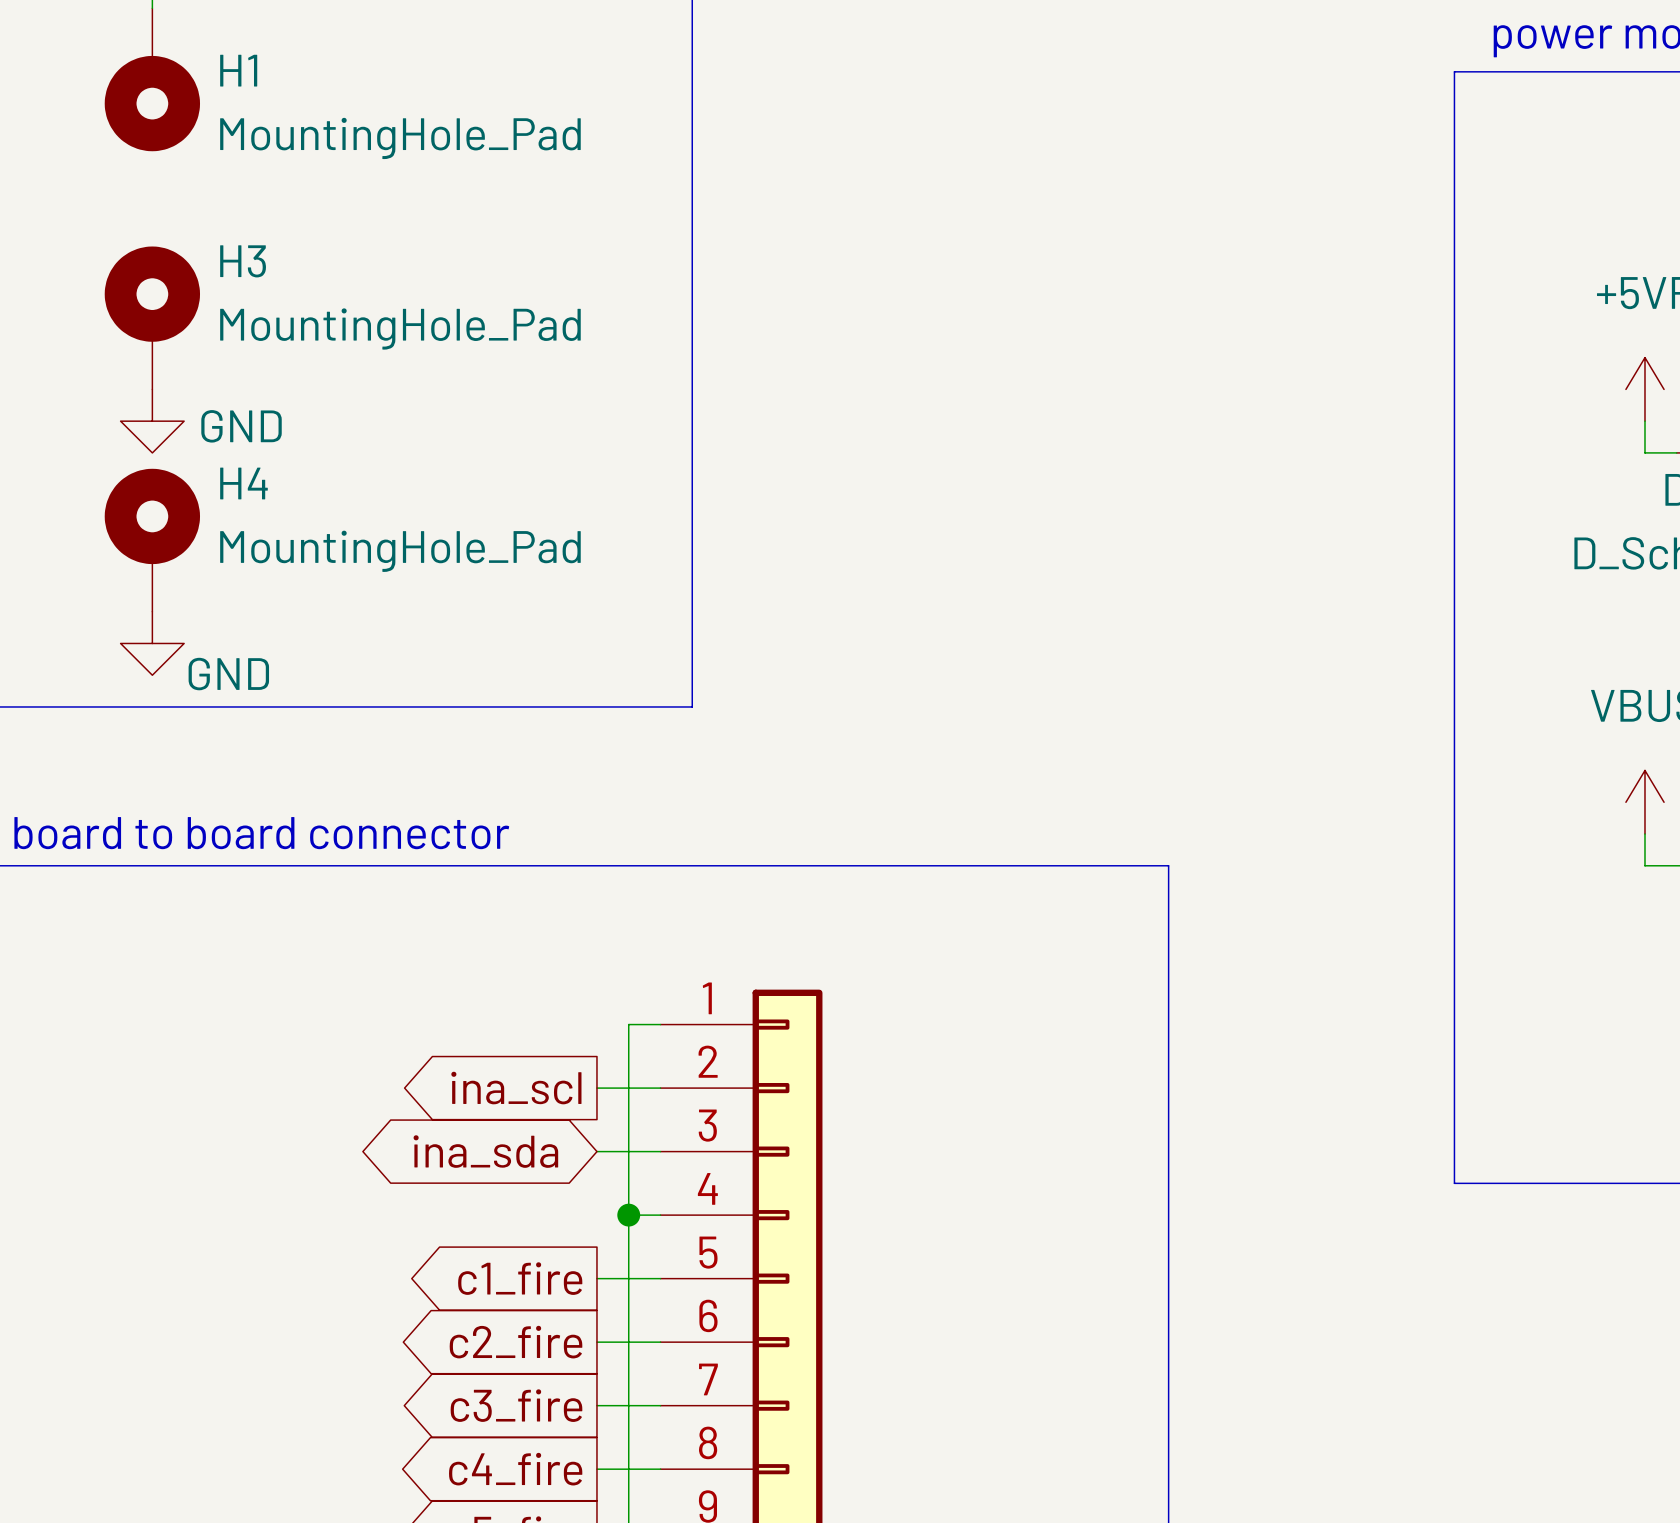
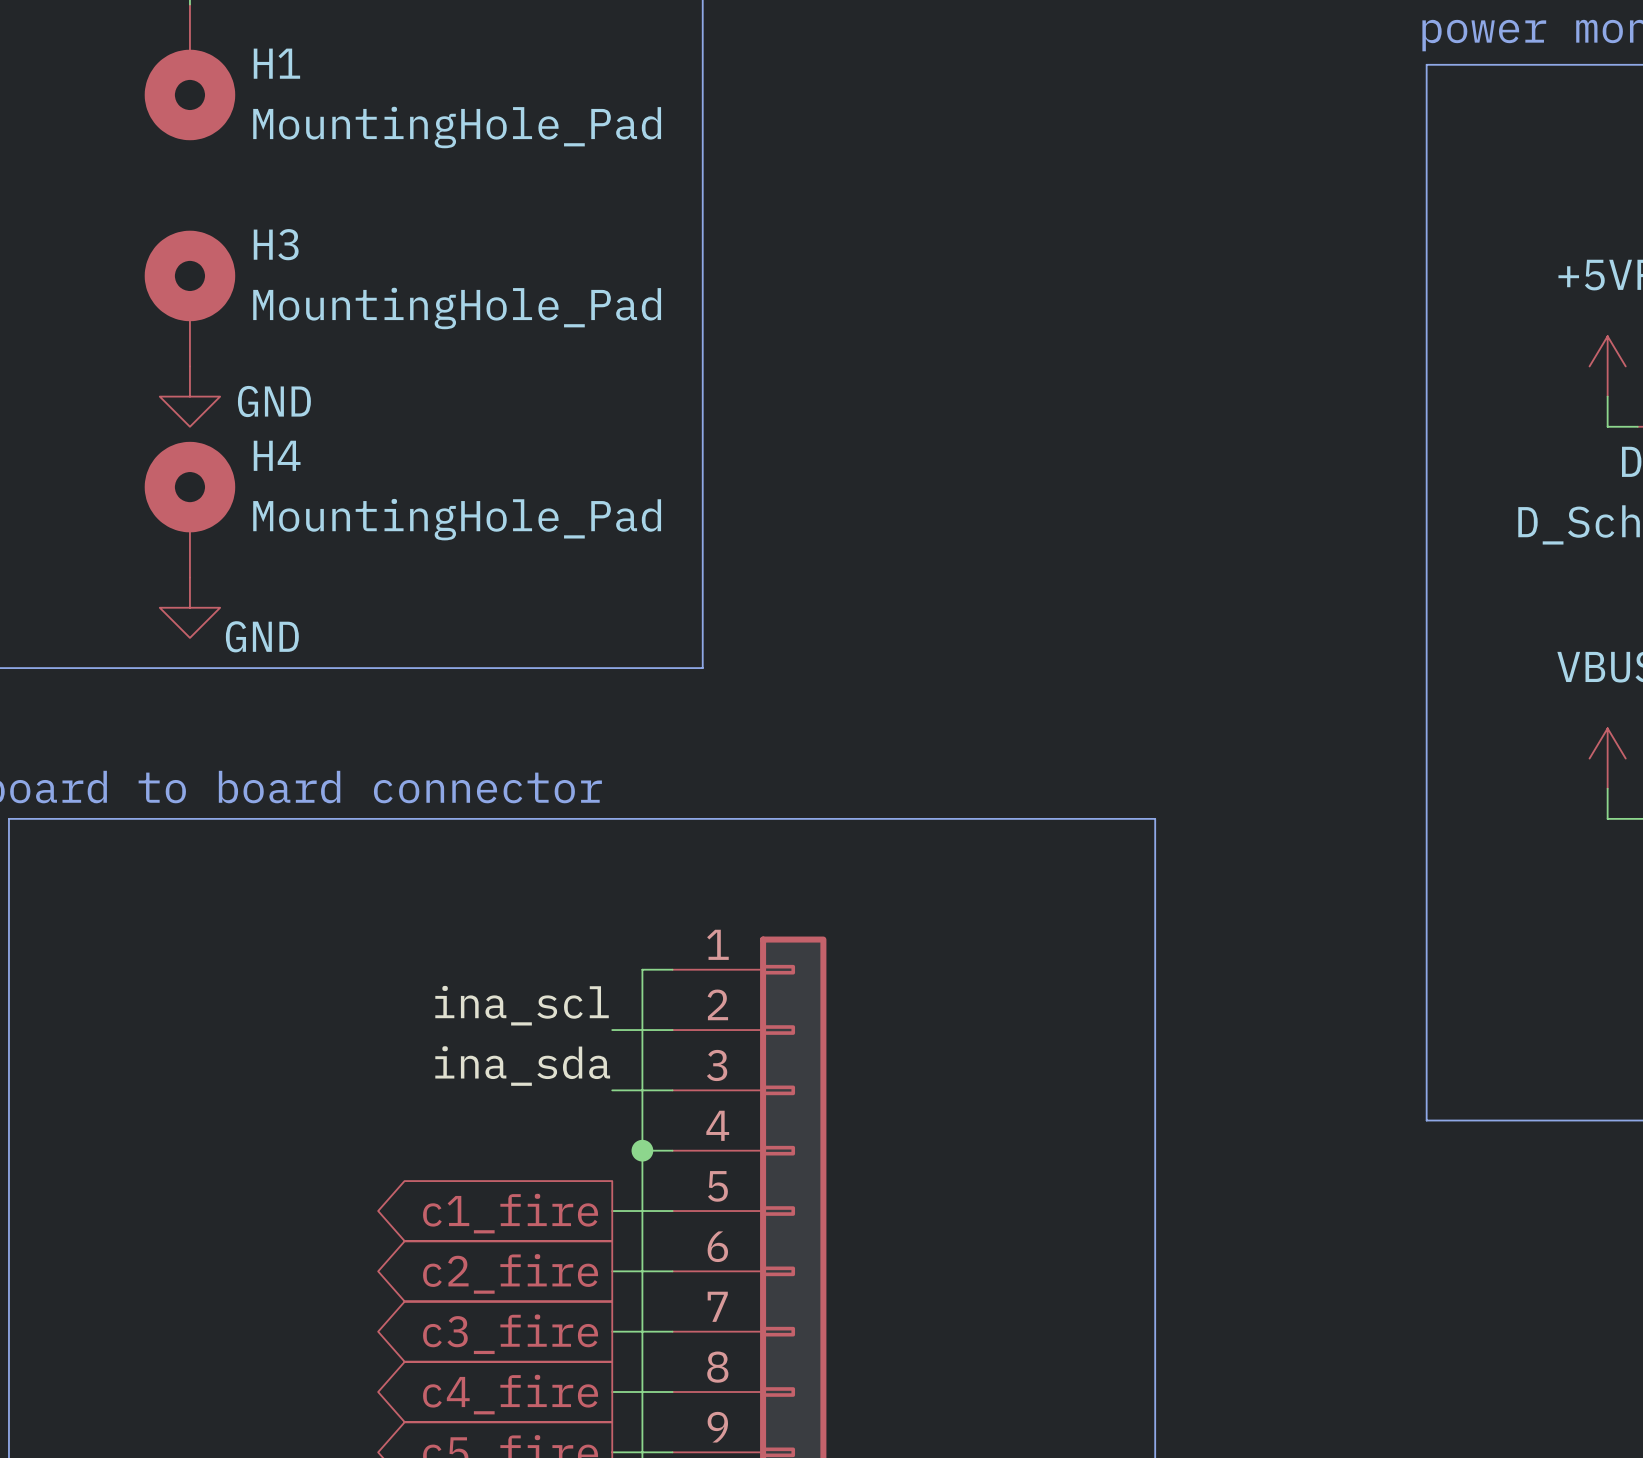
label: none -> ina_scl (522, 1005)
global label: ina_scl (516, 1088) -> none
label: none -> ina_sda (522, 1066)
global label: ina_sda (485, 1151) -> none

